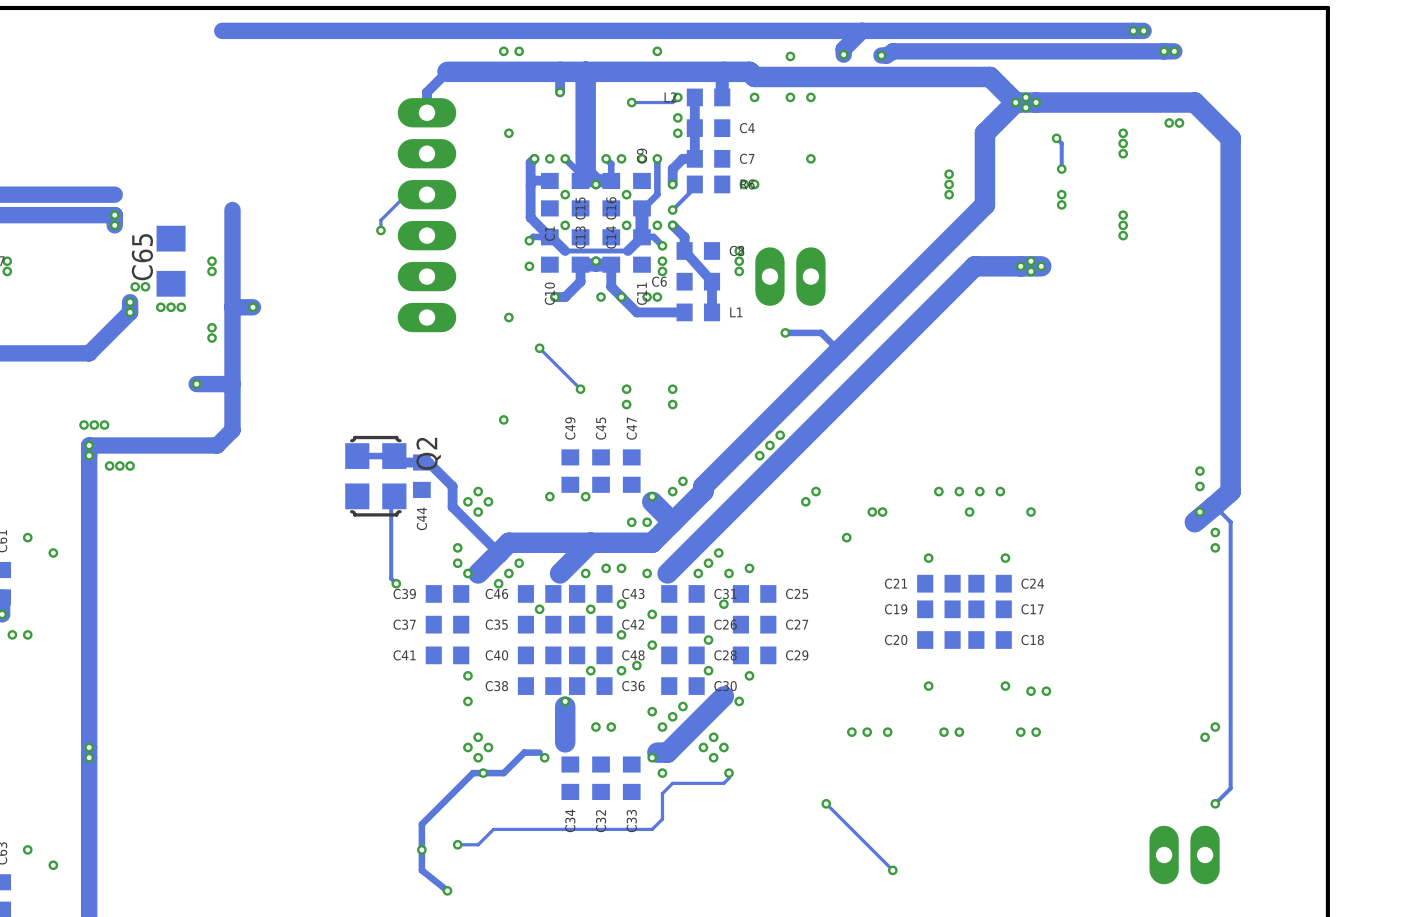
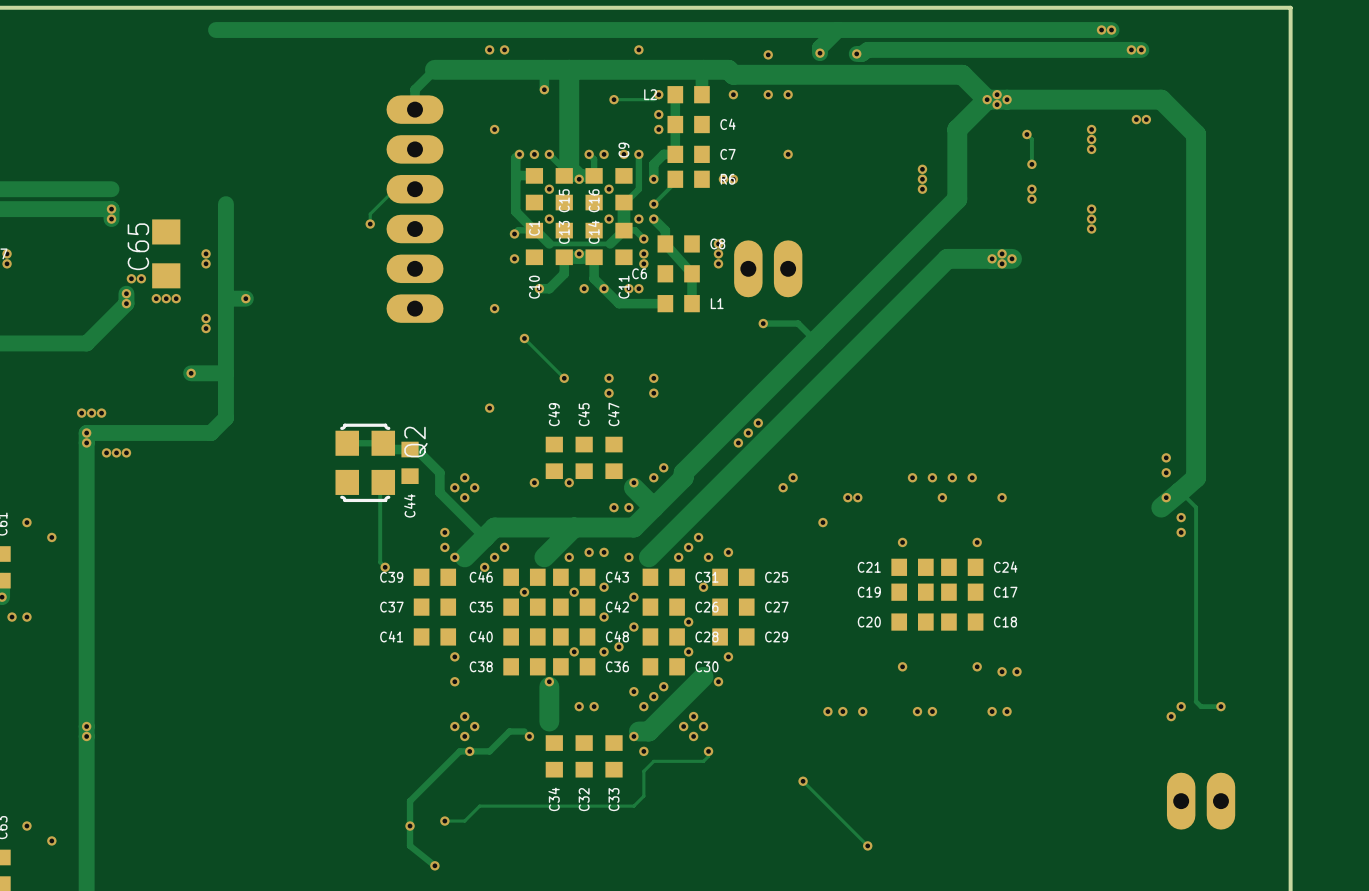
track: (1230, 721) (1230, 788) (1215, 803) -> (1196, 701) (1201, 706) (1220, 706)
via position: (1215, 803) -> (1220, 706)
part position: (1184, 855) -> (1201, 801)

